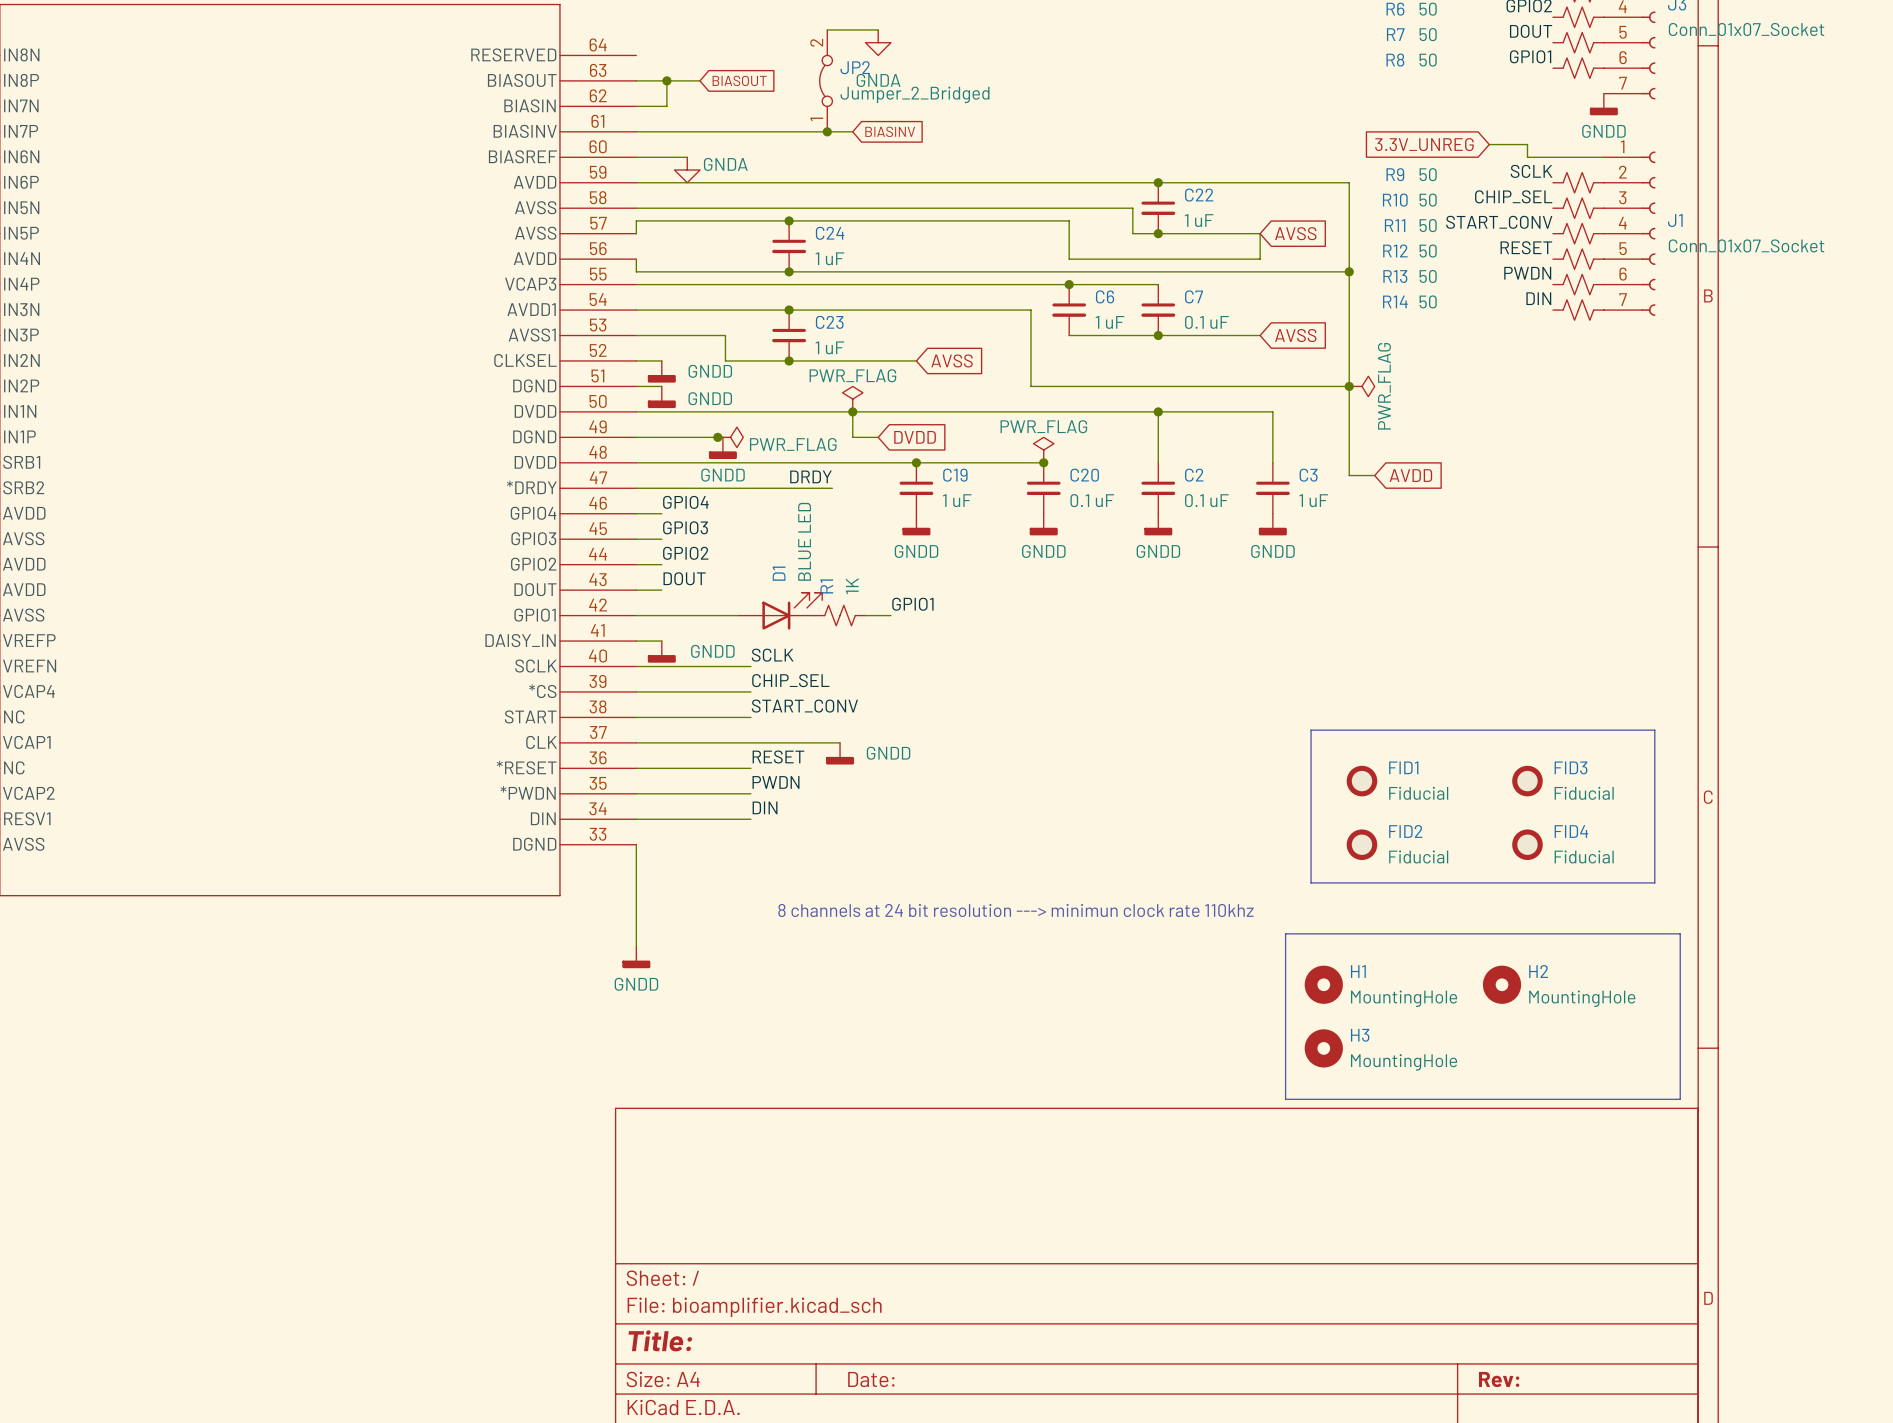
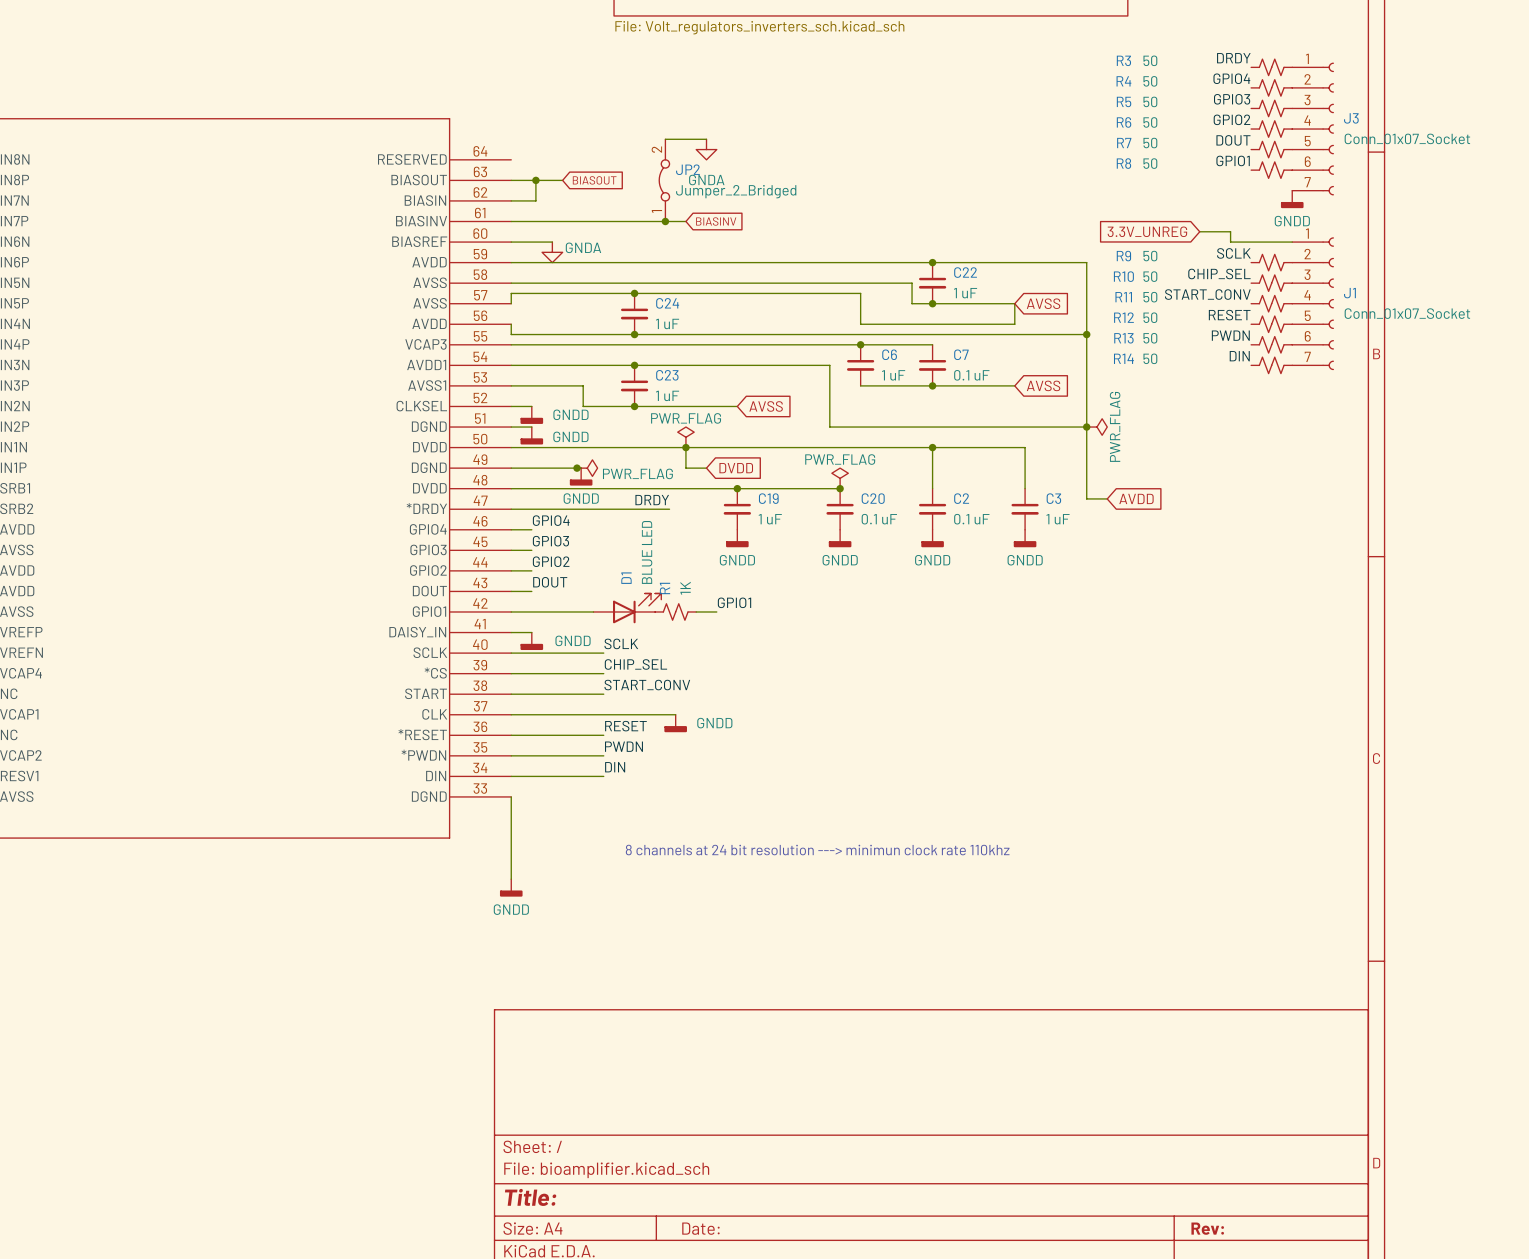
line: (1311, 730) (1654, 730) (1654, 882) (1311, 882) (1311, 730) -> none
FID1: Fiducial (1361, 781) -> none
FID3: Fiducial (1527, 781) -> none
FID2: Fiducial (1361, 844) -> none
FID4: Fiducial (1527, 844) -> none
line: (1285, 933) (1680, 933) (1680, 1099) (1285, 1099) (1285, 933) -> none
H1: MountingHole (1323, 984) -> none
H2: MountingHole (1502, 984) -> none
H3: MountingHole (1323, 1048) -> none

